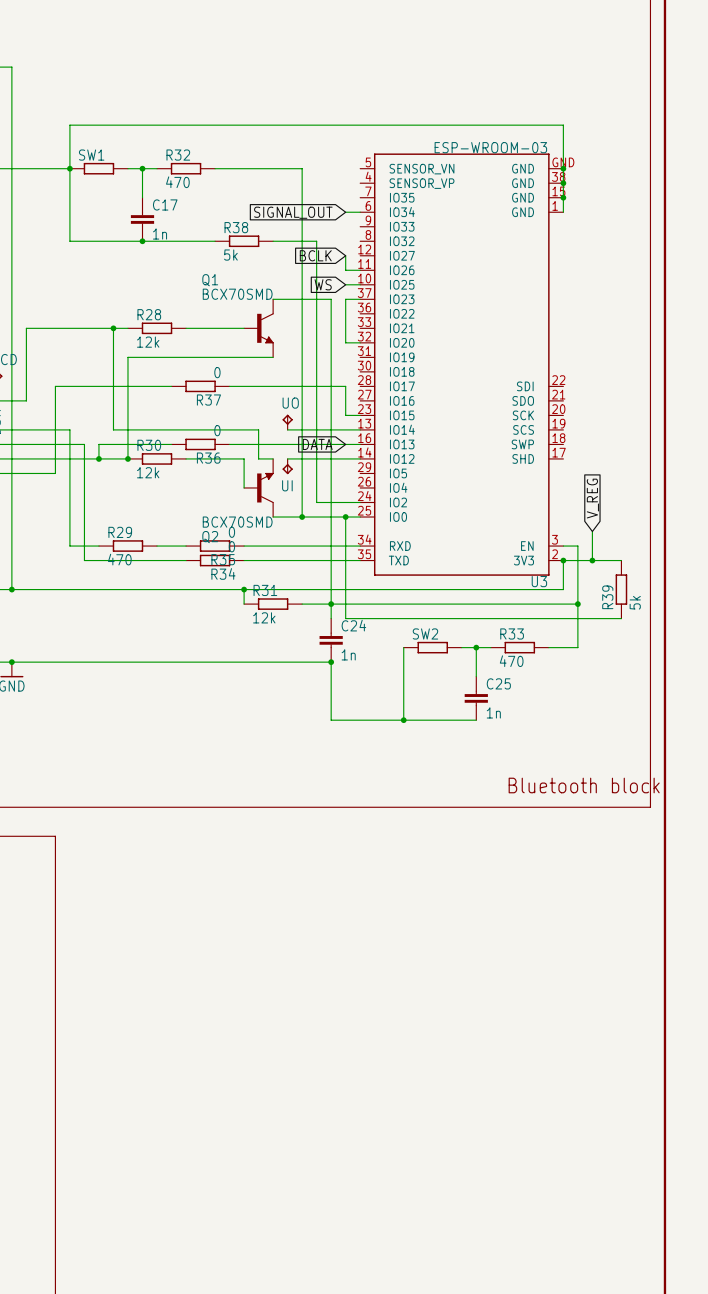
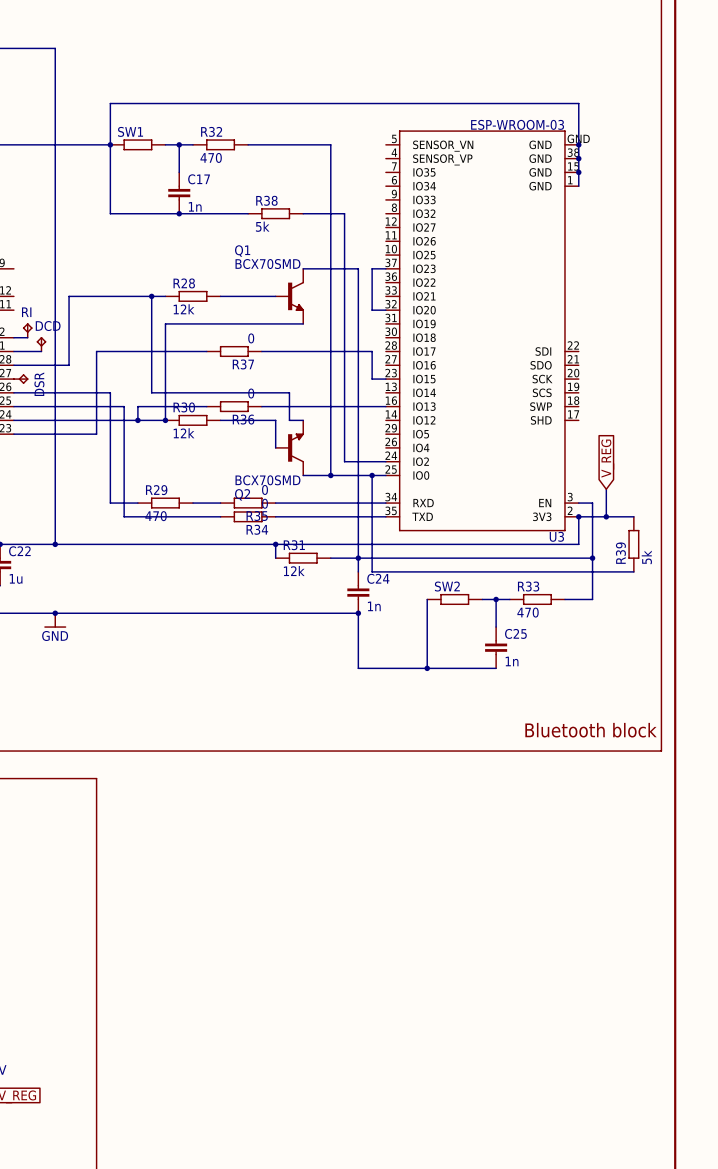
global label: SIGNAL_OUT (293, 212) -> none
wire: (345, 212) (360, 212) -> none
global label: BCLK (315, 255) -> none
wire: (345, 255) (345, 270) (360, 270) -> none
global label: WS (323, 284) -> none
wire: (345, 284) (360, 284) -> none
UO: (287, 422) -> none
wire: (287, 429) (360, 429) -> none
global label: DATA (317, 444) -> none
wire: (287, 458) (360, 458) -> none
UI: (287, 466) -> none

